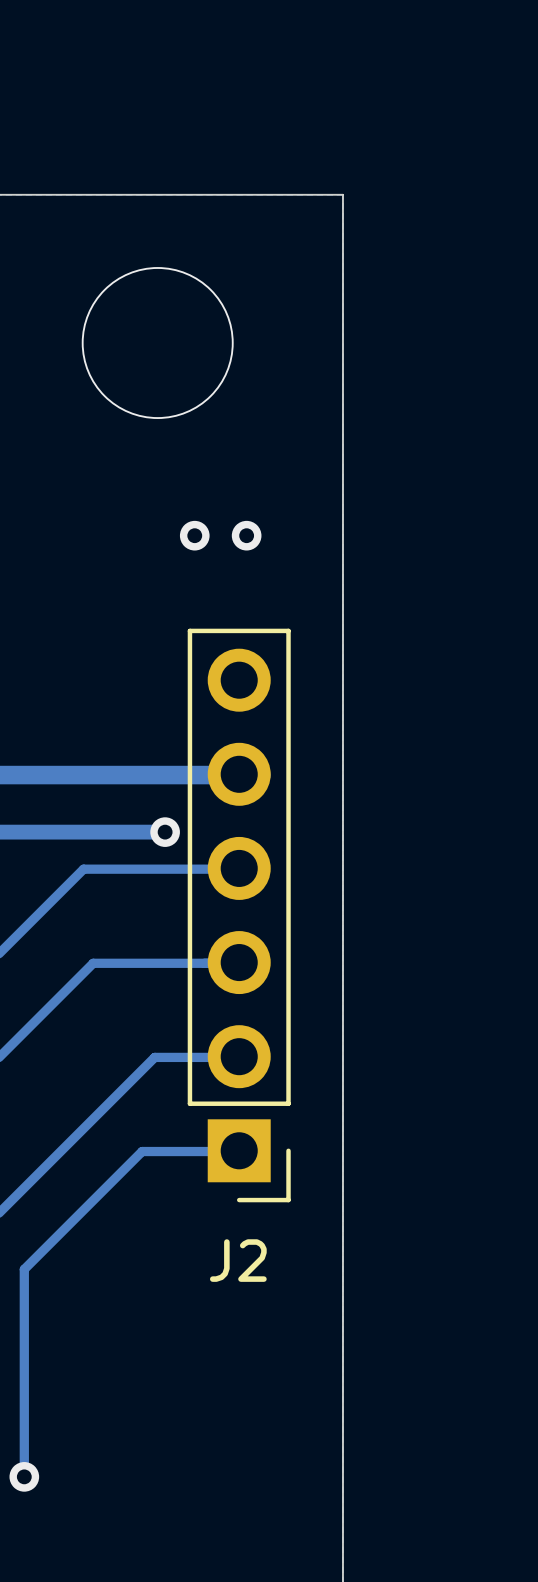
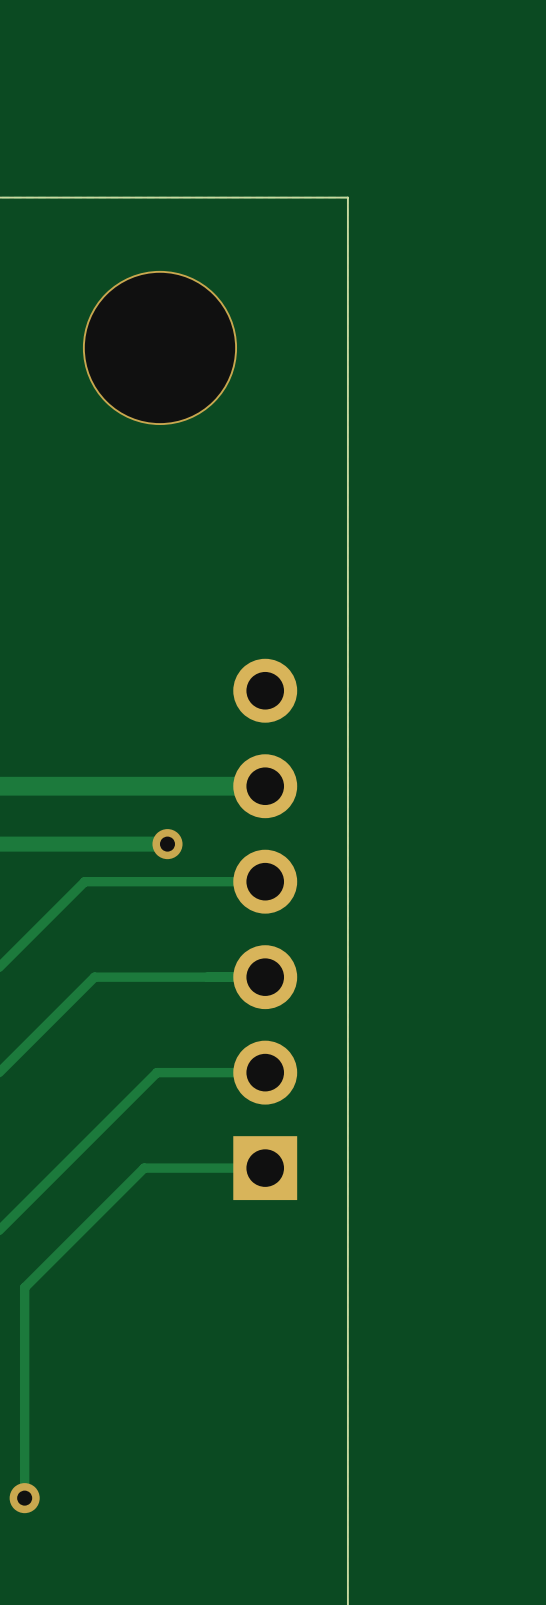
via: (194, 535) -> none
via: (246, 535) -> none
J2 side: bottom (239, 915) -> top (265, 929)

